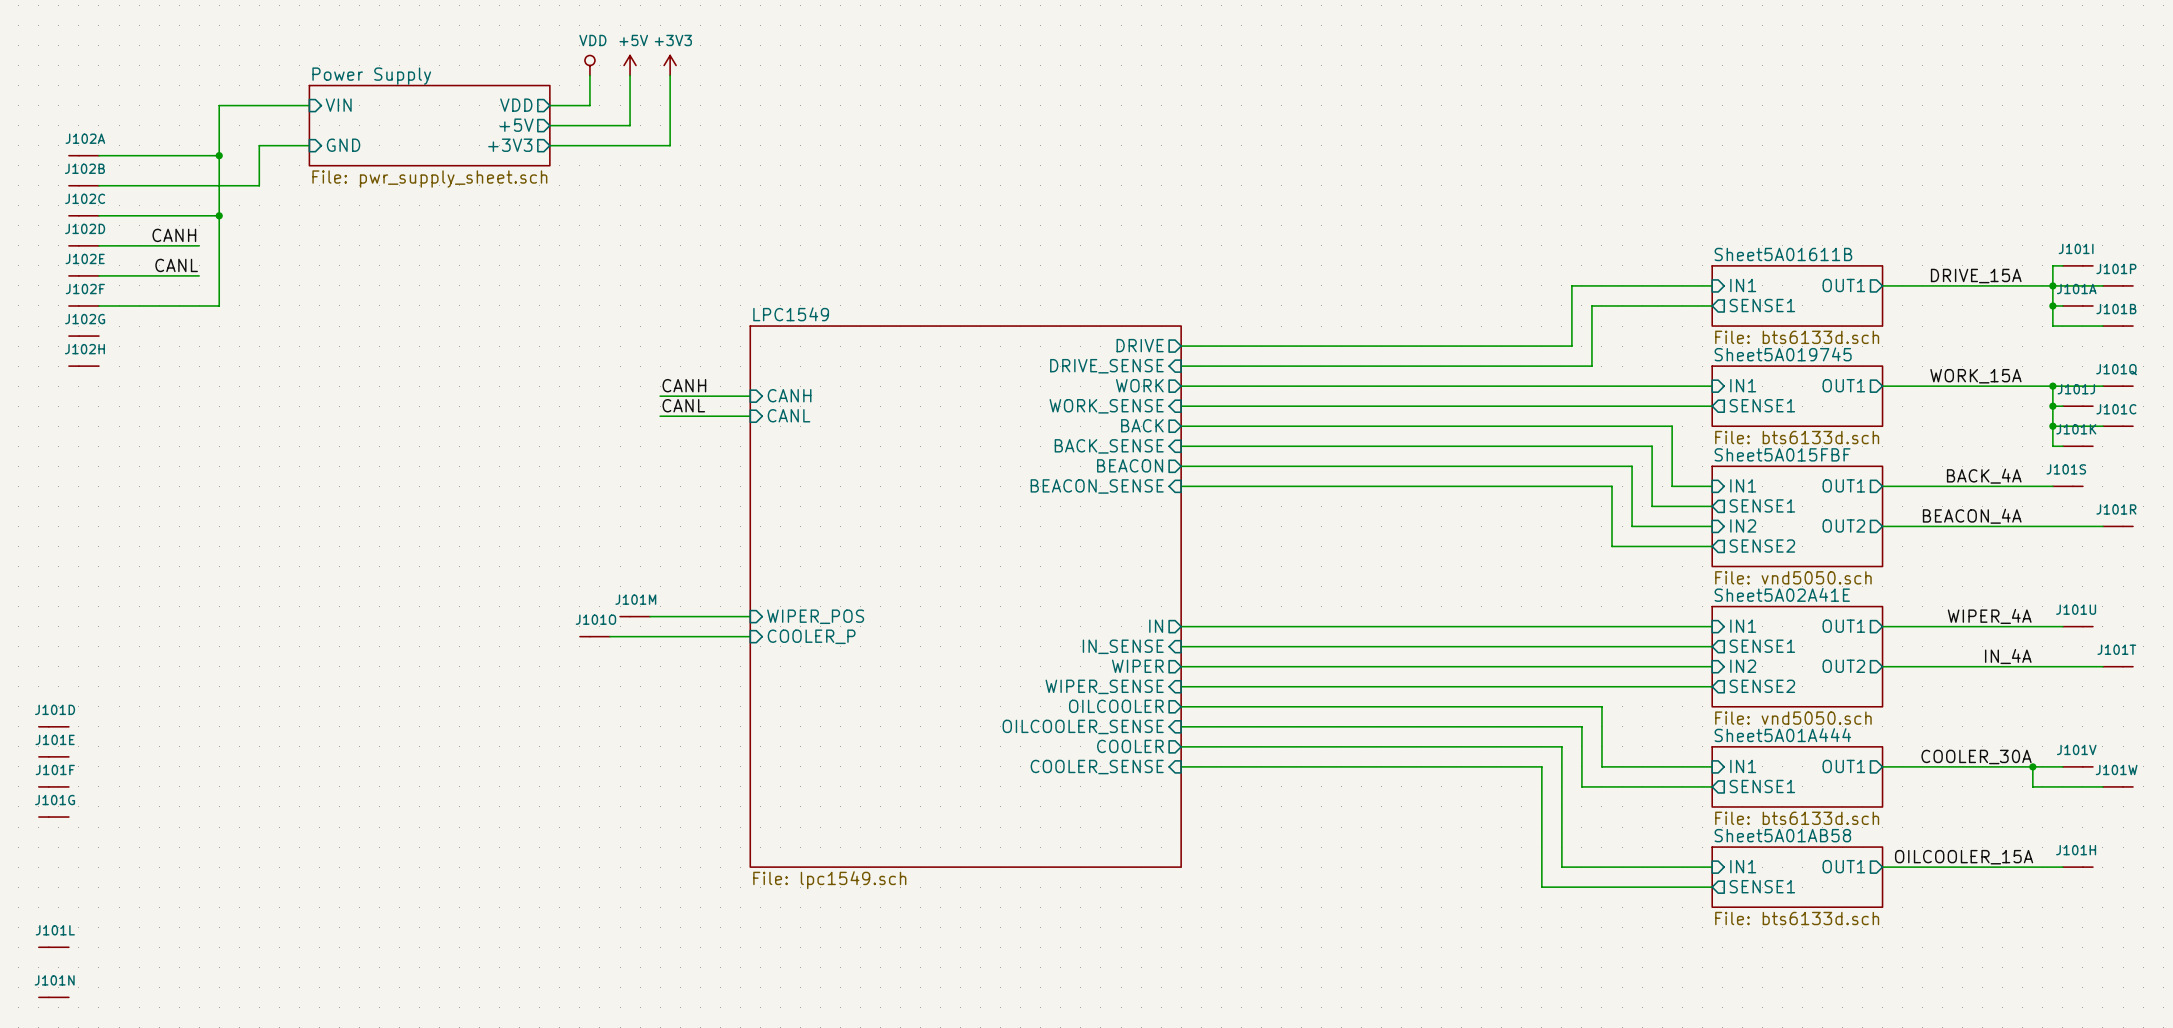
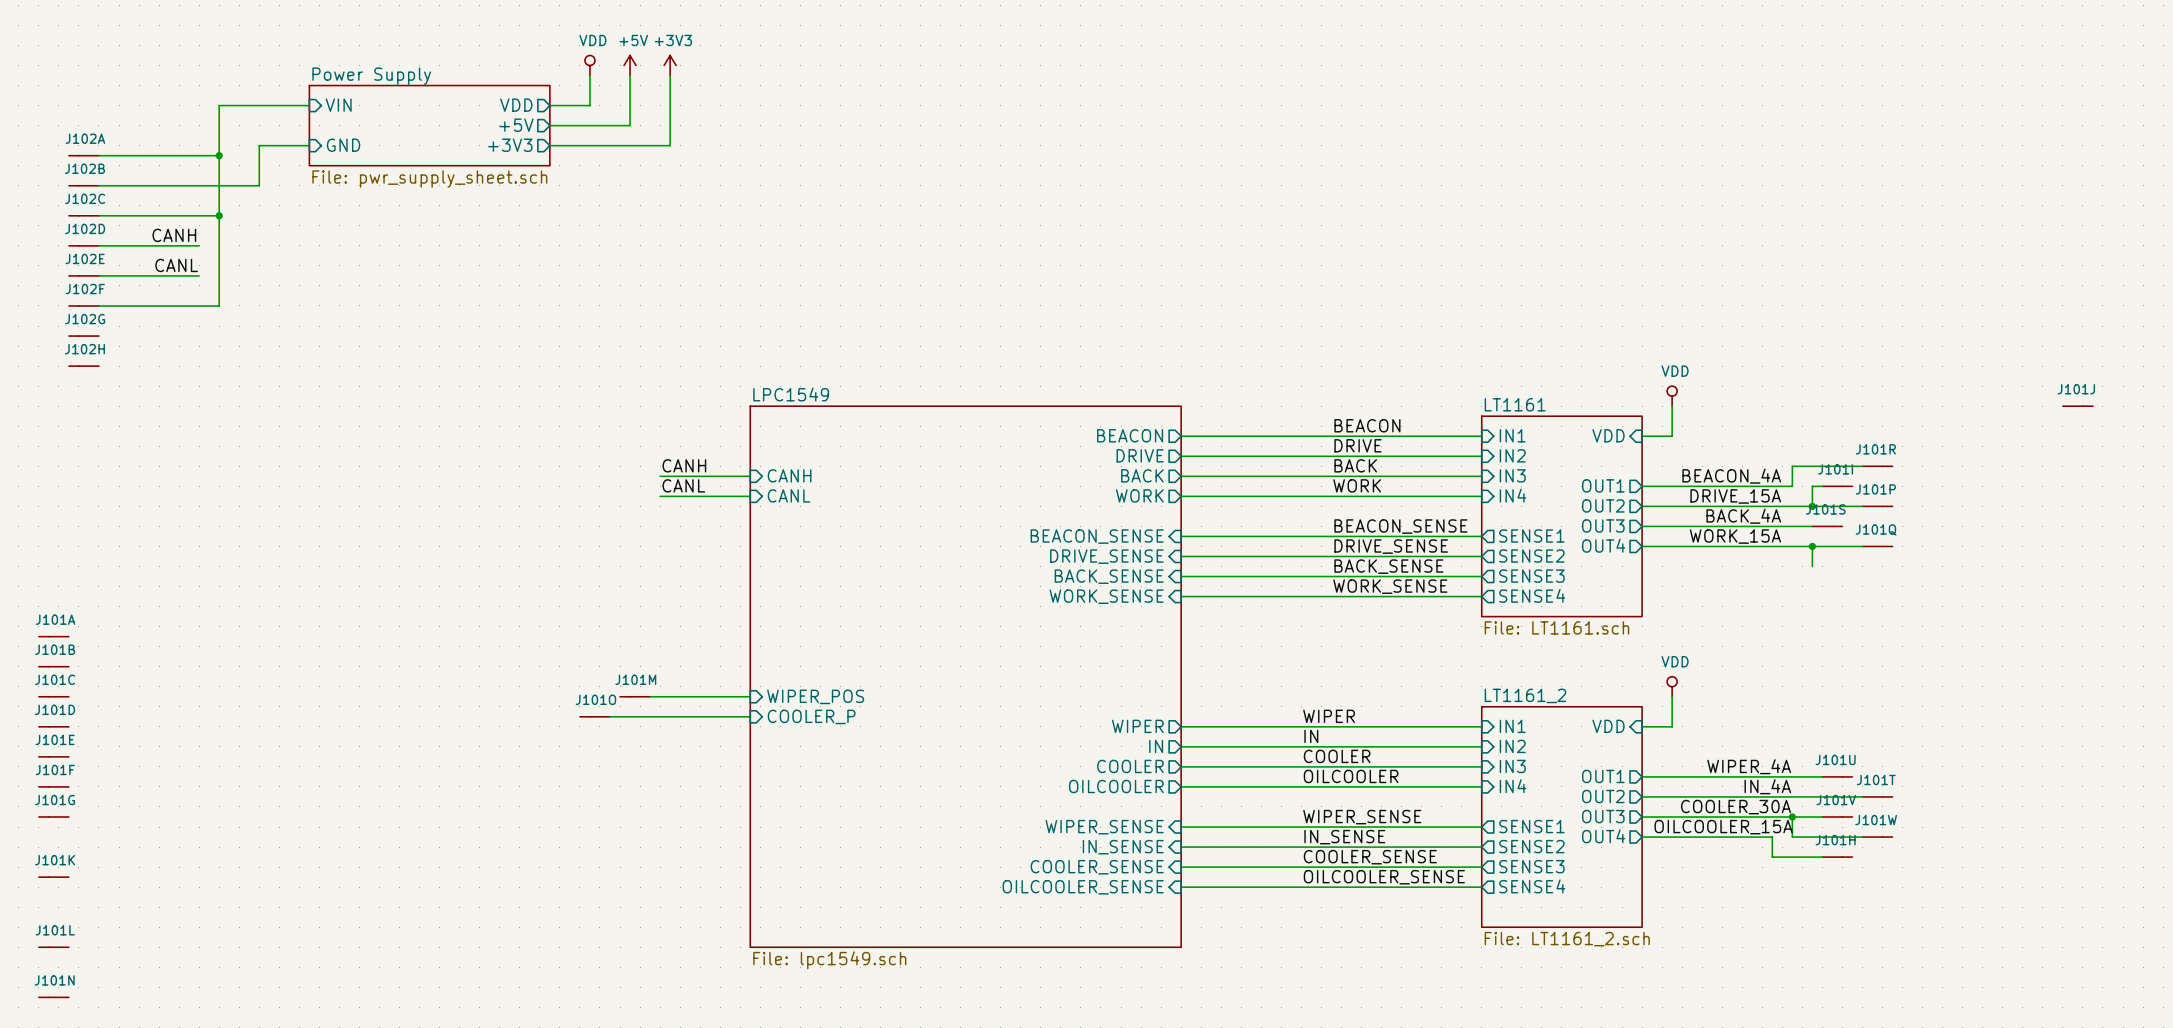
wire: (2062, 265) (2052, 265) (2052, 326) (2102, 326) -> none
J101I position: (2077, 265) -> (1837, 486)
label: DRIVE_15A (1976, 276) -> none
wire: (1712, 285) (1571, 285) (1571, 346) (1181, 346) -> none
sheet pin: IN1 (1743, 285) -> none
sheet pin: OUT1 (1843, 285) -> none
wire: (1882, 285) (2102, 285) -> none
junction: (2052, 285) -> none
J101P position: (2118, 285) -> (1877, 506)
sheet Sheet5A01611B: File: bts6133d.sch (1797, 295) -> none
wire: (1712, 305) (1591, 305) (1591, 366) (1181, 366) -> none
sheet pin: SENSE1 (1762, 305) -> none
wire: (2052, 305) (2062, 305) -> none
junction: (2052, 305) -> none
J101A position: (2077, 305) -> (53, 636)
J101A rotation: 0° (2087, 305) -> 180° (43, 636)
J101B position: (2118, 326) -> (53, 666)
J101B rotation: 0° (2128, 326) -> 180° (43, 666)
sheet pin position: DRIVE (1140, 345) -> DRIVE (1140, 455)
sheet pin position: DRIVE_SENSE (1106, 366) -> DRIVE_SENSE (1106, 556)
label: WORK_15A (1975, 376) -> none
label position: CANH (684, 385) -> CANH (684, 465)
sheet pin position: WORK (1139, 385) -> WORK (1139, 495)
sheet pin: IN1 (1743, 385) -> none
sheet pin: OUT1 (1843, 385) -> none
wire: (1181, 386) (1712, 386) -> none
wire: (1882, 386) (2102, 386) -> none
wire: (2052, 386) (2052, 446) (2062, 446) -> none
junction: (2052, 386) -> none
J101Q position: (2118, 386) -> (1877, 546)
sheet pin position: CANH (789, 395) -> CANH (789, 475)
wire: (660, 396) (750, 396) -> (660, 476) (750, 476)
power symbol: none -> VDD (1672, 396)
sheet Sheet5A019745: File: bts6133d.sch (1797, 396) -> none
label position: CANL (683, 405) -> CANL (683, 485)
sheet pin: SENSE1 (1762, 405) -> none
sheet pin position: WORK_SENSE (1106, 406) -> WORK_SENSE (1106, 596)
wire: (1181, 406) (1712, 406) -> none
wire: (2052, 406) (2062, 406) -> none
junction: (2052, 406) -> none
sheet pin position: CANL (789, 415) -> CANL (789, 495)
wire: (660, 416) (750, 416) -> (660, 496) (750, 496)
sheet pin position: BACK (1142, 425) -> BACK (1142, 475)
label: none -> BEACON (1367, 425)
wire: (1181, 426) (1672, 426) -> (1672, 406) (1672, 426)
wire: (2052, 426) (2102, 426) -> none
junction: (2052, 426) -> none
J101C position: (2118, 426) -> (53, 696)
J101C rotation: 0° (2128, 426) -> 180° (43, 696)
sheet pin: none -> IN1 (1512, 435)
sheet pin: none -> VDD (1608, 435)
wire: none -> (1181, 436) (1481, 436)
wire: (1672, 436) (1672, 486) -> (1672, 436) (1642, 436)
label: none -> DRIVE (1357, 445)
sheet pin position: BACK_SENSE (1109, 446) -> BACK_SENSE (1109, 576)
wire: (1181, 446) (1652, 446) (1652, 506) -> (1642, 506) (1652, 506)
J101K position: (2077, 446) -> (53, 877)
J101K rotation: 0° (2087, 446) -> 180° (43, 877)
sheet pin: none -> IN2 (1512, 455)
wire: none -> (1181, 456) (1481, 456)
sheet pin position: BEACON (1130, 465) -> BEACON (1130, 435)
label: none -> BACK (1355, 465)
wire: (1181, 466) (1632, 466) (1632, 526) (1642, 526) -> none
wire: none -> (1862, 466) (1792, 466) (1792, 486) (1712, 486)
sheet pin: none -> IN3 (1512, 475)
wire: none -> (1181, 476) (1481, 476)
label: none -> BEACON_4A (1731, 476)
label: BACK_4A (1984, 476) -> none
label: none -> WORK (1357, 485)
sheet pin: none -> OUT1 (1603, 485)
sheet pin: IN1 (1743, 485) -> none
sheet pin: OUT1 (1843, 485) -> none
sheet pin position: BEACON_SENSE (1097, 486) -> BEACON_SENSE (1097, 536)
wire: (1181, 486) (1612, 486) (1612, 546) (1642, 546) -> none
wire: none -> (1642, 486) (1672, 486)
wire: none -> (1822, 486) (1812, 486) (1812, 506)
wire: (1882, 486) (2052, 486) -> none
J101S position: (2067, 486) -> (1827, 526)
sheet pin: none -> IN4 (1513, 495)
wire: none -> (1181, 496) (1481, 496)
label: none -> DRIVE_15A (1735, 496)
sheet pin: none -> OUT2 (1603, 505)
sheet pin: SENSE1 (1762, 505) -> none
wire: none -> (1712, 506) (1862, 506)
junction: none -> (1812, 506)
sheet LT1161: none -> File: LT1161.sch (1561, 516)
label: none -> BACK_4A (1743, 516)
sheet Sheet5A015FBF: File: vnd5050.sch (1797, 516) -> none
label: BEACON_4A (1972, 516) -> none
sheet pin: none -> OUT3 (1603, 525)
sheet pin: IN2 (1743, 525) -> none
sheet pin: OUT2 (1843, 525) -> none
label: none -> BEACON_SENSE (1400, 526)
wire: none -> (1712, 526) (1812, 526)
wire: (1882, 526) (2102, 526) -> none
J101R position: (2118, 526) -> (1877, 466)
wire: none -> (1181, 536) (1481, 536)
sheet pin: none -> SENSE1 (1531, 536)
label: none -> WORK_15A (1735, 536)
sheet pin: none -> OUT4 (1603, 545)
label: none -> DRIVE_SENSE (1391, 546)
wire: none -> (1712, 546) (1862, 546)
sheet pin: SENSE2 (1762, 546) -> none
wire: none -> (1812, 546) (1812, 566)
junction: none -> (1812, 546)
wire: none -> (1181, 556) (1481, 556)
sheet pin: none -> SENSE2 (1531, 556)
label: none -> BACK_SENSE (1388, 566)
wire: none -> (1181, 576) (1481, 576)
sheet pin: none -> SENSE3 (1531, 576)
label: none -> WORK_SENSE (1390, 586)
sheet pin: none -> SENSE4 (1532, 595)
sheet LPC1549 position: (965, 596) -> (965, 676)
wire: none -> (1181, 596) (1481, 596)
J101M position: (635, 616) -> (635, 696)
wire: (650, 616) (750, 616) -> (650, 696) (750, 696)
sheet pin position: WIPER_POS (815, 616) -> WIPER_POS (815, 696)
label: WIPER_4A (1989, 616) -> none
sheet pin: IN (1156, 626) -> none
wire: (1181, 626) (1712, 626) -> none
sheet pin: IN1 (1743, 626) -> none
sheet pin: OUT1 (1843, 626) -> none
wire: (1882, 626) (2062, 626) -> none
J101U position: (2077, 626) -> (1837, 776)
J101O position: (594, 636) -> (594, 716)
wire: (609, 636) (750, 636) -> (609, 716) (750, 716)
sheet pin position: COOLER_P (811, 636) -> COOLER_P (811, 716)
sheet pin: IN_SENSE (1123, 646) -> none
wire: (1181, 646) (1712, 646) -> none
sheet pin: SENSE1 (1762, 646) -> none
sheet Sheet5A02A41E: File: vnd5050.sch (1797, 656) -> none
label: IN_4A (2008, 656) -> none
sheet pin: WIPER (1137, 666) -> none
wire: (1181, 666) (1712, 666) -> none
sheet pin: IN2 (1743, 666) -> none
sheet pin: OUT2 (1843, 666) -> none
wire: (1882, 666) (2102, 666) -> none
J101T position: (2118, 666) -> (1877, 796)
sheet pin position: WIPER_SENSE (1104, 686) -> WIPER_SENSE (1104, 827)
wire: (1181, 686) (1712, 686) -> none
power symbol: none -> VDD (1672, 686)
sheet pin: SENSE2 (1762, 686) -> none
wire: none -> (1672, 696) (1672, 726) (1642, 726)
sheet pin position: OILCOOLER (1116, 706) -> OILCOOLER (1116, 786)
wire: (1181, 706) (1601, 706) (1601, 766) (1712, 766) -> none
label: none -> WIPER (1329, 716)
sheet pin shape: input (1083, 726) -> output (1137, 726)
sheet pin: OILCOOLER_SENSE (1083, 726) -> WIPER (1137, 726)
wire: (1481, 726) (1581, 726) (1581, 786) (1712, 786) -> none
sheet pin: none -> IN1 (1512, 726)
sheet pin: none -> VDD (1608, 726)
label: none -> IN (1311, 736)
sheet pin: COOLER (1130, 746) -> IN (1156, 746)
wire: (1481, 746) (1561, 746) (1561, 867) (1712, 867) -> none
sheet pin: none -> IN2 (1512, 746)
label: none -> COOLER (1337, 756)
label: COOLER_30A (1976, 756) -> none
wire: (1481, 766) (1541, 766) (1541, 887) (1712, 887) -> none
sheet pin: none -> IN3 (1512, 766)
sheet pin: IN1 (1743, 766) -> none
label: none -> WIPER_4A (1749, 766)
sheet pin: OUT1 (1843, 766) -> none
wire: (1882, 766) (2062, 766) -> none
wire: (2032, 766) (2032, 786) (2102, 786) -> none
junction: (2032, 766) -> none
J101V position: (2077, 766) -> (1837, 817)
sheet pin shape: input (1097, 767) -> output (1130, 766)
sheet pin: COOLER_SENSE (1097, 767) -> COOLER (1130, 766)
label: none -> OILCOOLER (1351, 776)
sheet pin: none -> OUT1 (1603, 776)
wire: none -> (1642, 776) (1822, 776)
sheet Sheet5A01A444: File: bts6133d.sch (1797, 776) -> none
wire: none -> (1181, 786) (1481, 786)
sheet pin: none -> IN4 (1513, 786)
sheet pin: SENSE1 (1762, 786) -> none
label: none -> IN_4A (1767, 786)
J101W position: (2118, 786) -> (1877, 837)
sheet pin: none -> OUT2 (1603, 796)
wire: none -> (1642, 796) (1862, 796)
label: none -> COOLER_30A (1736, 807)
sheet pin: none -> OUT3 (1603, 816)
label: none -> WIPER_SENSE (1362, 817)
sheet LT1161_2: none -> File: LT1161_2.sch (1561, 817)
wire: none -> (1642, 817) (1822, 817)
wire: none -> (1792, 817) (1792, 837) (1862, 837)
junction: none -> (1792, 817)
sheet pin: none -> SENSE1 (1531, 826)
wire: none -> (1181, 827) (1481, 827)
label: none -> OILCOOLER_15A (1723, 827)
sheet pin: none -> OUT4 (1603, 836)
label: none -> IN_SENSE (1344, 837)
wire: none -> (1642, 837) (1772, 837) (1772, 857) (1822, 857)
sheet pin: none -> SENSE2 (1531, 846)
sheet pin: none -> IN_SENSE (1123, 847)
wire: none -> (1181, 847) (1481, 847)
label: none -> COOLER_SENSE (1370, 857)
label: OILCOOLER_15A (1964, 857) -> none
sheet pin: none -> SENSE3 (1531, 866)
sheet pin: IN1 (1743, 866) -> none
sheet pin: OUT1 (1843, 866) -> none
sheet pin: none -> COOLER_SENSE (1097, 867)
wire: none -> (1181, 867) (1481, 867)
wire: (1882, 867) (2062, 867) -> none
J101H position: (2077, 867) -> (1837, 857)
label: none -> OILCOOLER_SENSE (1384, 877)
sheet Sheet5A01AB58: File: bts6133d.sch (1797, 877) -> none
sheet pin: none -> SENSE4 (1532, 886)
sheet pin: SENSE1 (1762, 886) -> none
sheet pin: none -> OILCOOLER_SENSE (1083, 887)
wire: none -> (1181, 887) (1481, 887)

